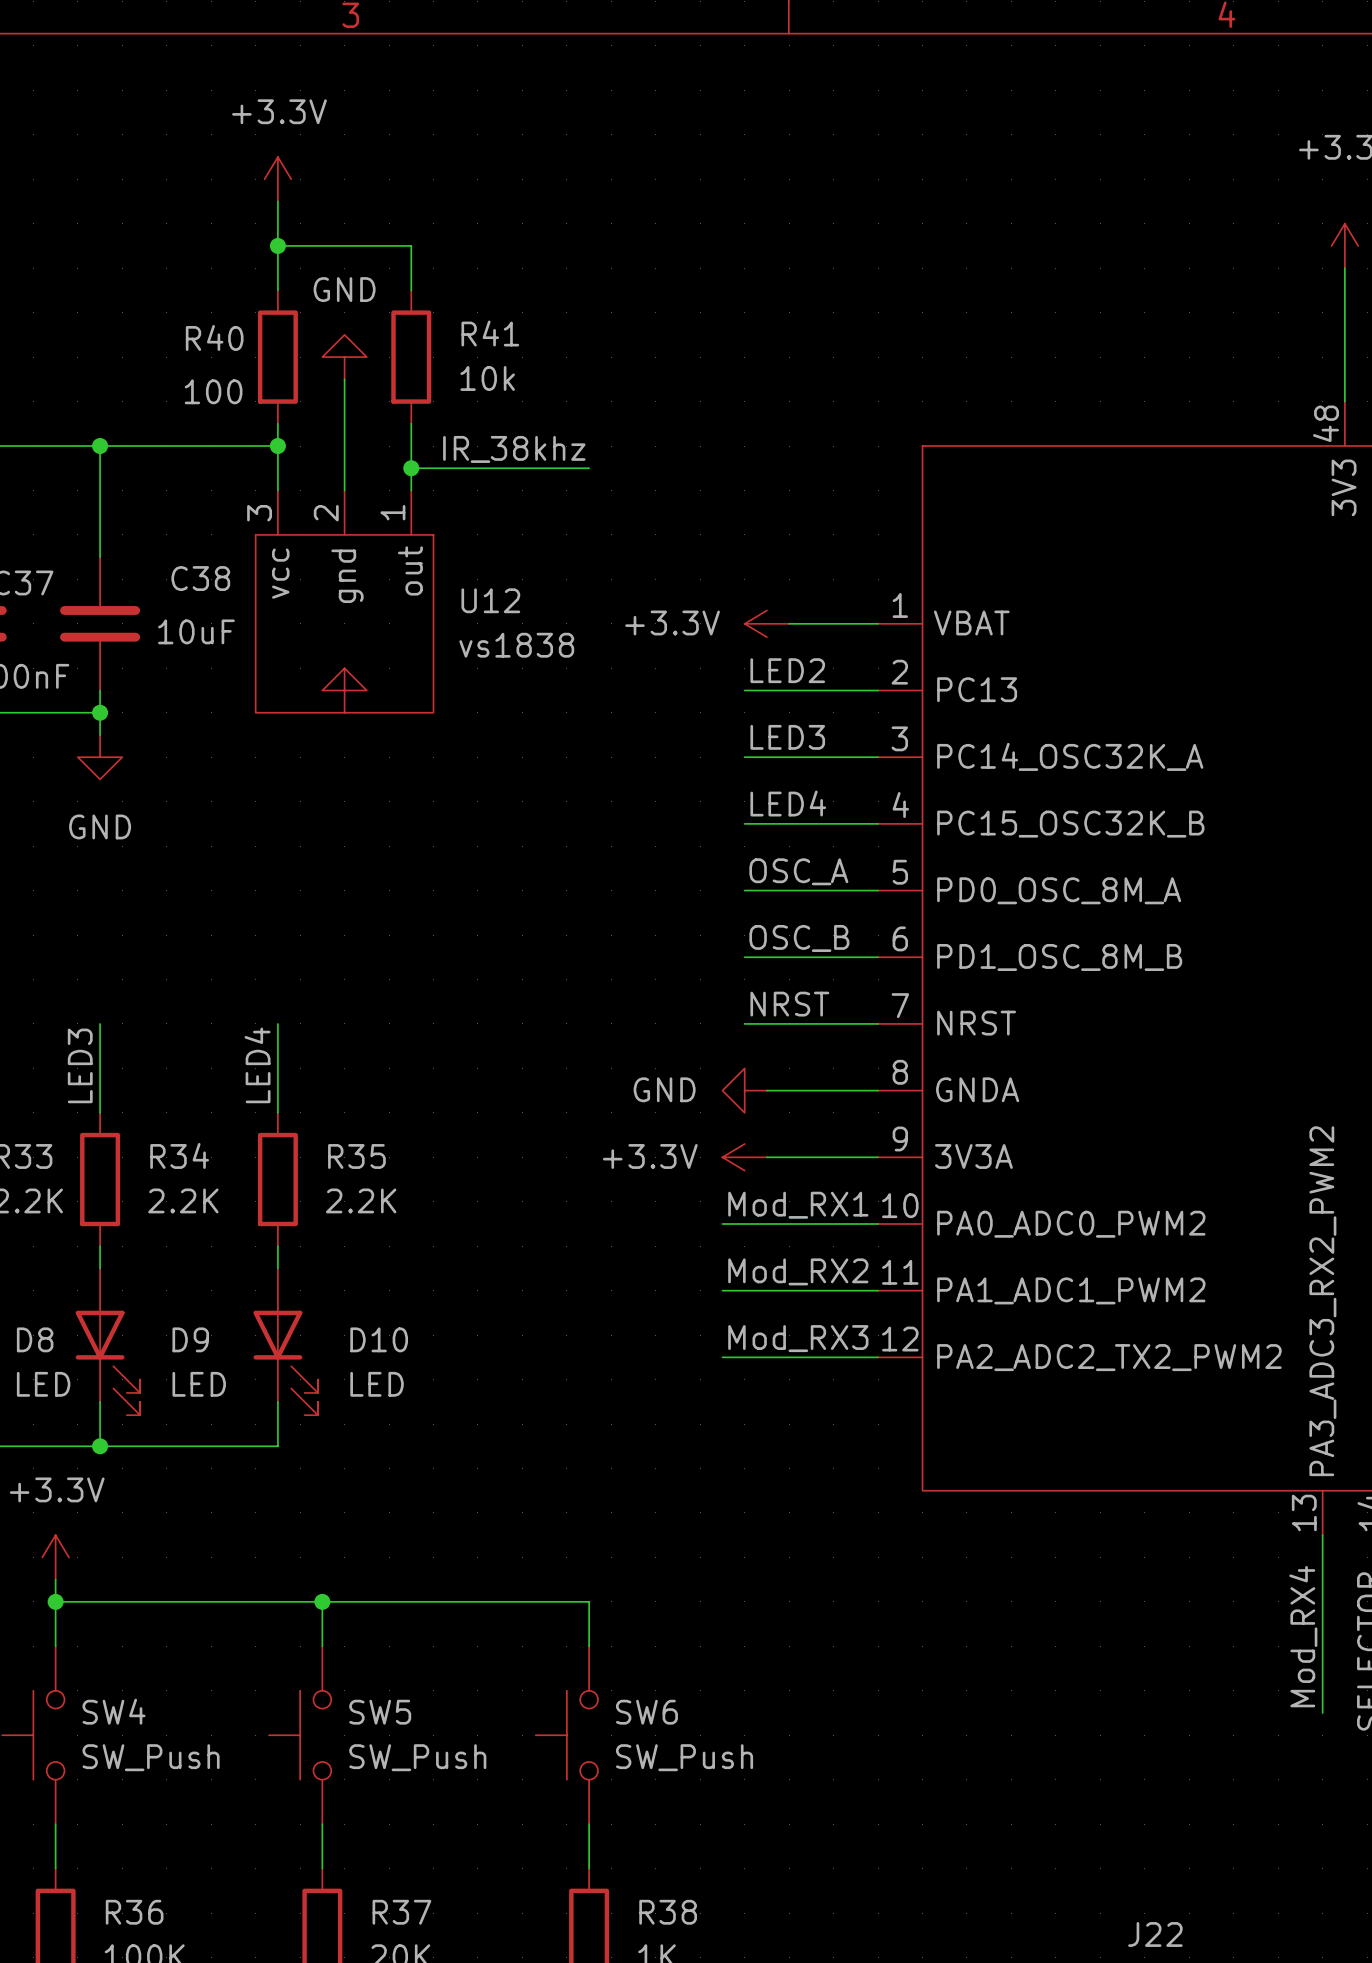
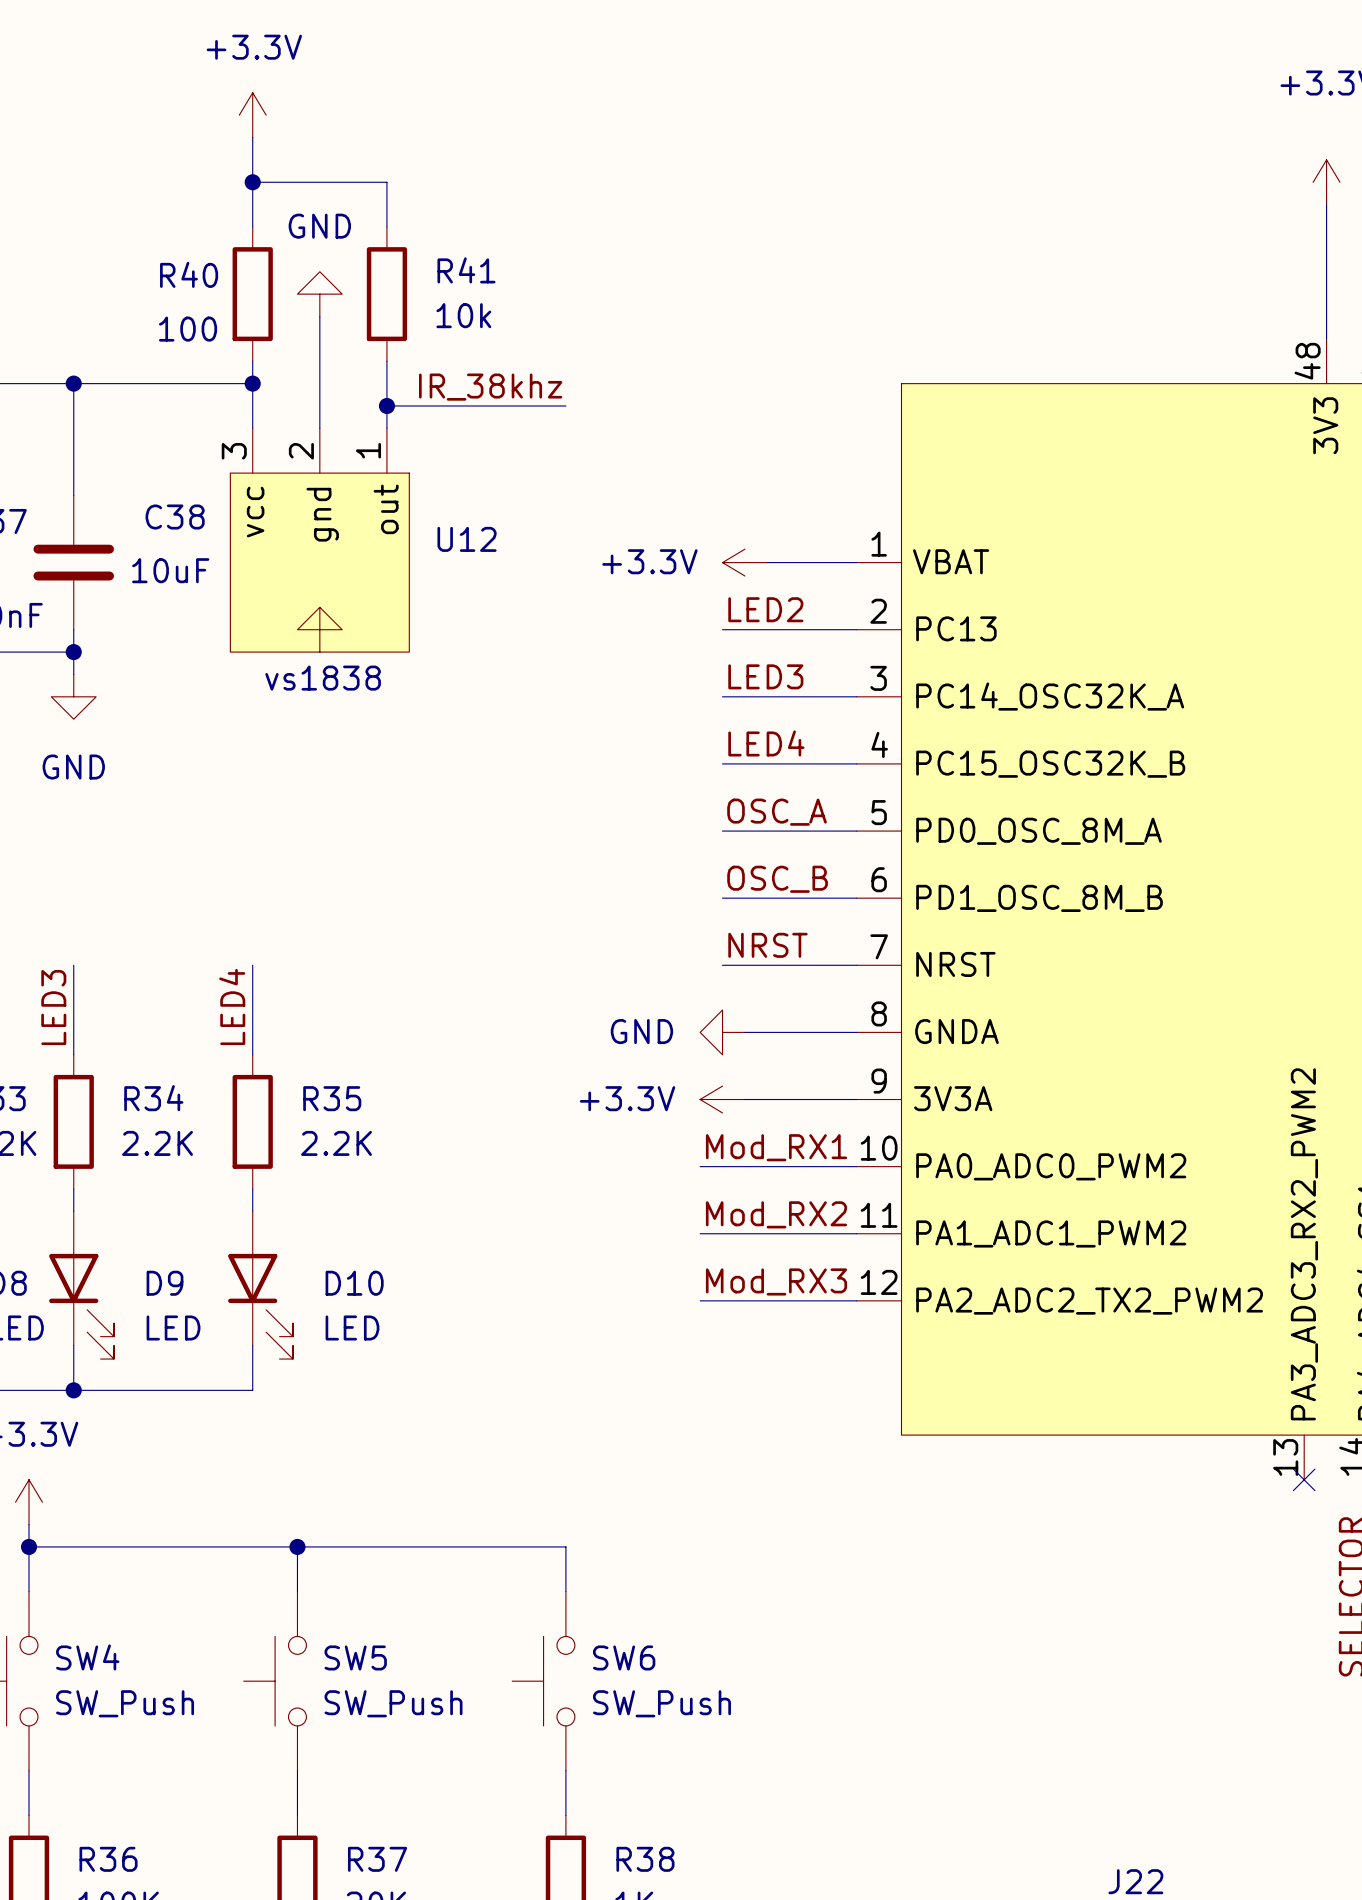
U12 symbol: [255, 490, 434, 713] -> [230, 428, 410, 653]
U12 value position: vs1838 (516, 645) -> vs1838 (323, 678)
wire: (1322, 1535) (1322, 1713) -> none
no-connect mark: none -> (1304, 1479)
label: Mod_RX4 (1303, 1636) -> none

